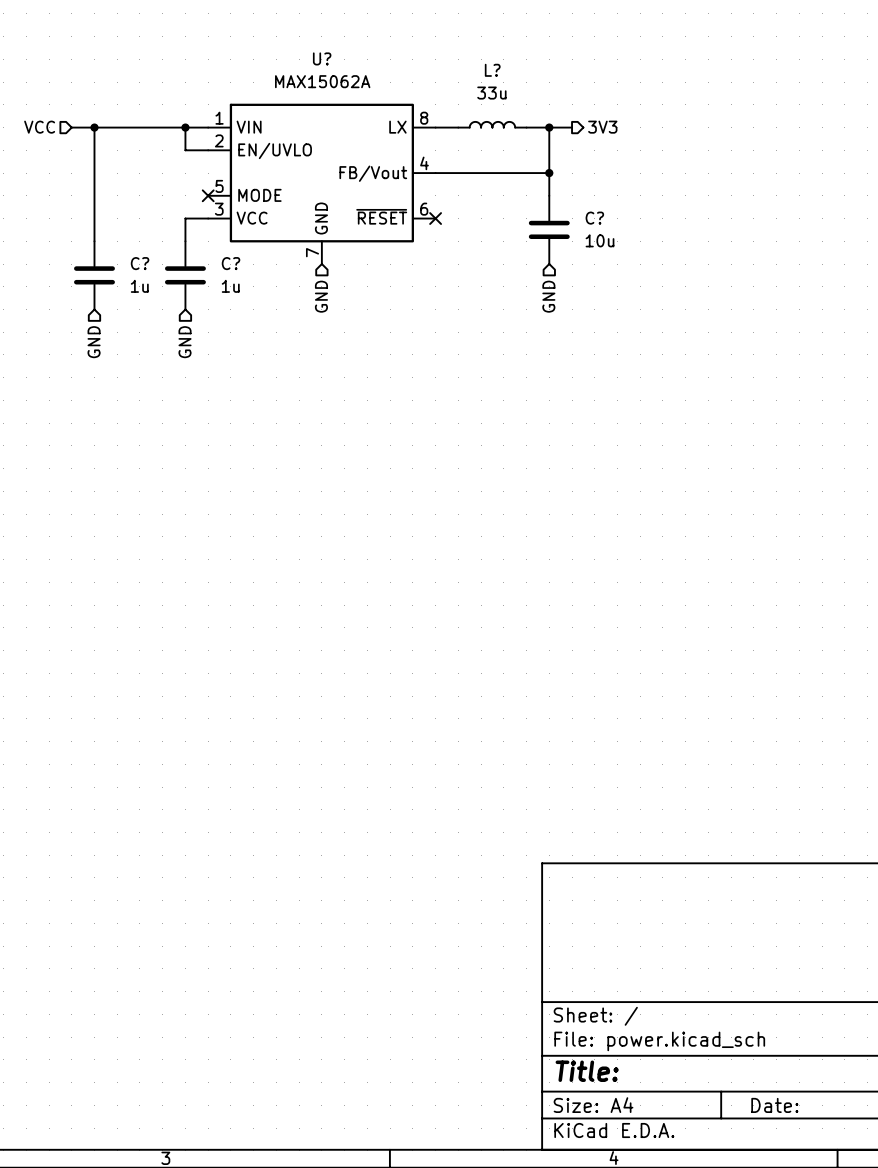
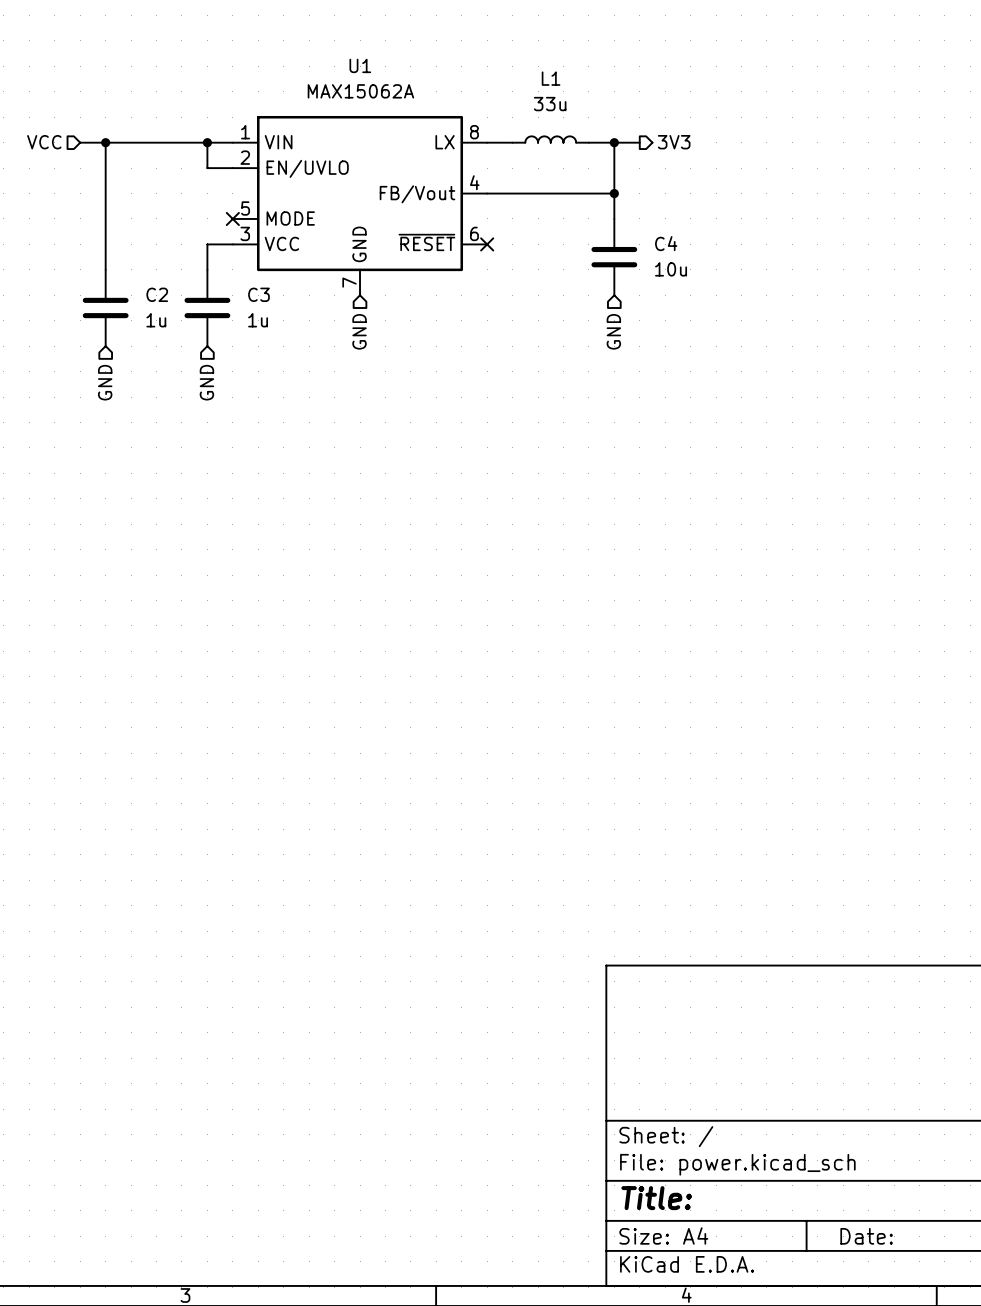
U? name: U? (322, 58) -> U1 (360, 65)
L?: 33u (492, 124) -> none
L1: none -> 33u (550, 139)
C? name: C? (594, 218) -> C4 (666, 243)
C? name: C? (140, 263) -> C2 (157, 294)
C? name: C? (231, 263) -> C3 (258, 294)

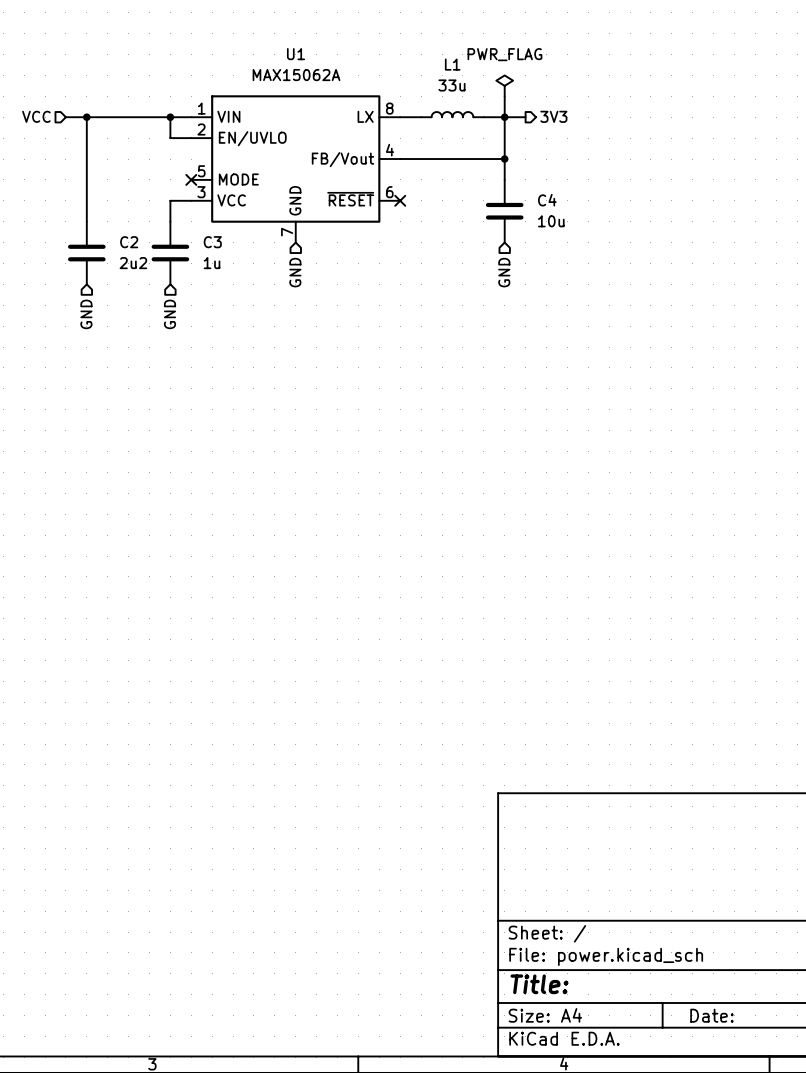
power symbol: none -> PWR_FLAG (504, 85)
wire: none -> (504, 96) (504, 117)
C2 value: 1u (156, 320) -> 2u2 (133, 263)

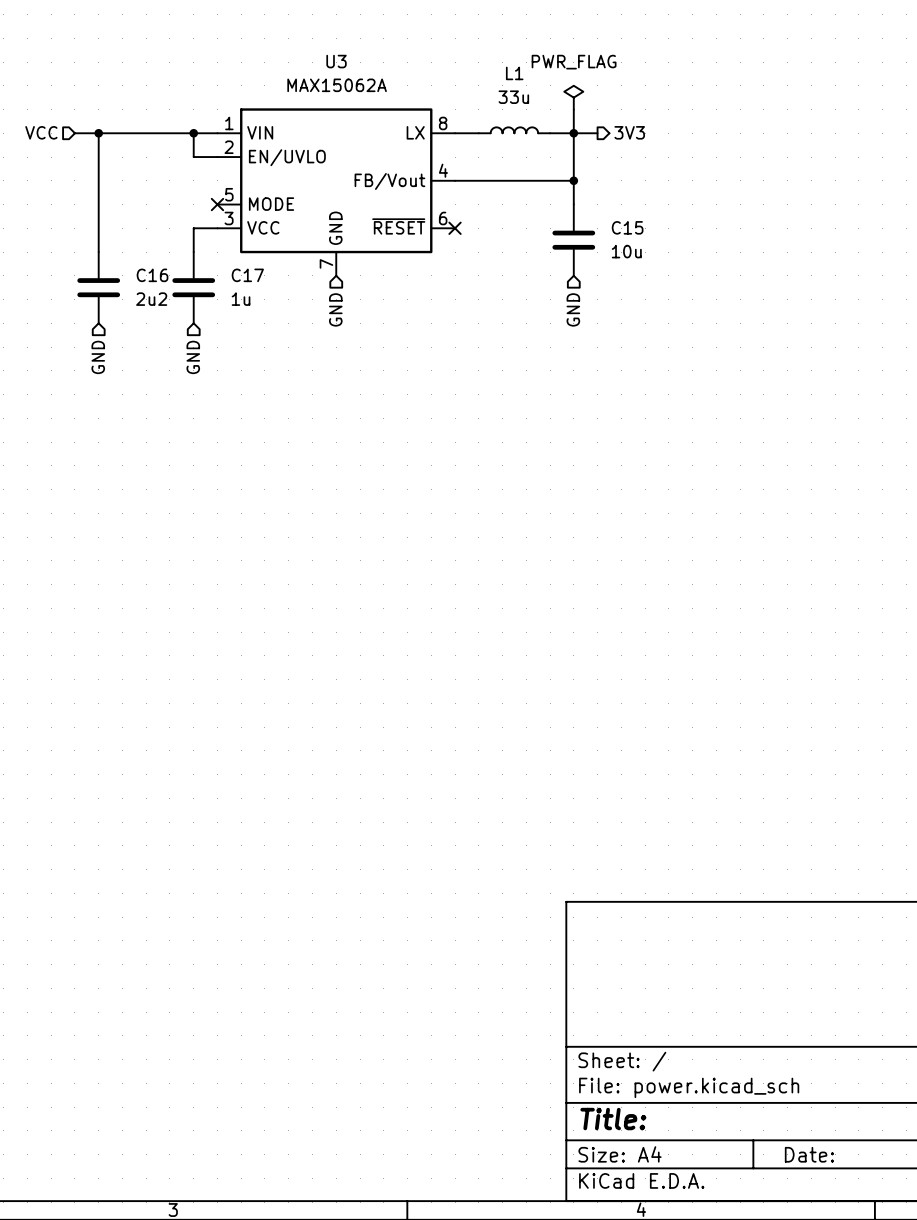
U1 name: U1 (296, 54) -> U3 (336, 61)
C4 name: C4 (547, 200) -> C15 (627, 227)
C2 name: C2 (129, 242) -> C16 (152, 275)
C3 name: C3 (212, 242) -> C17 (247, 275)

